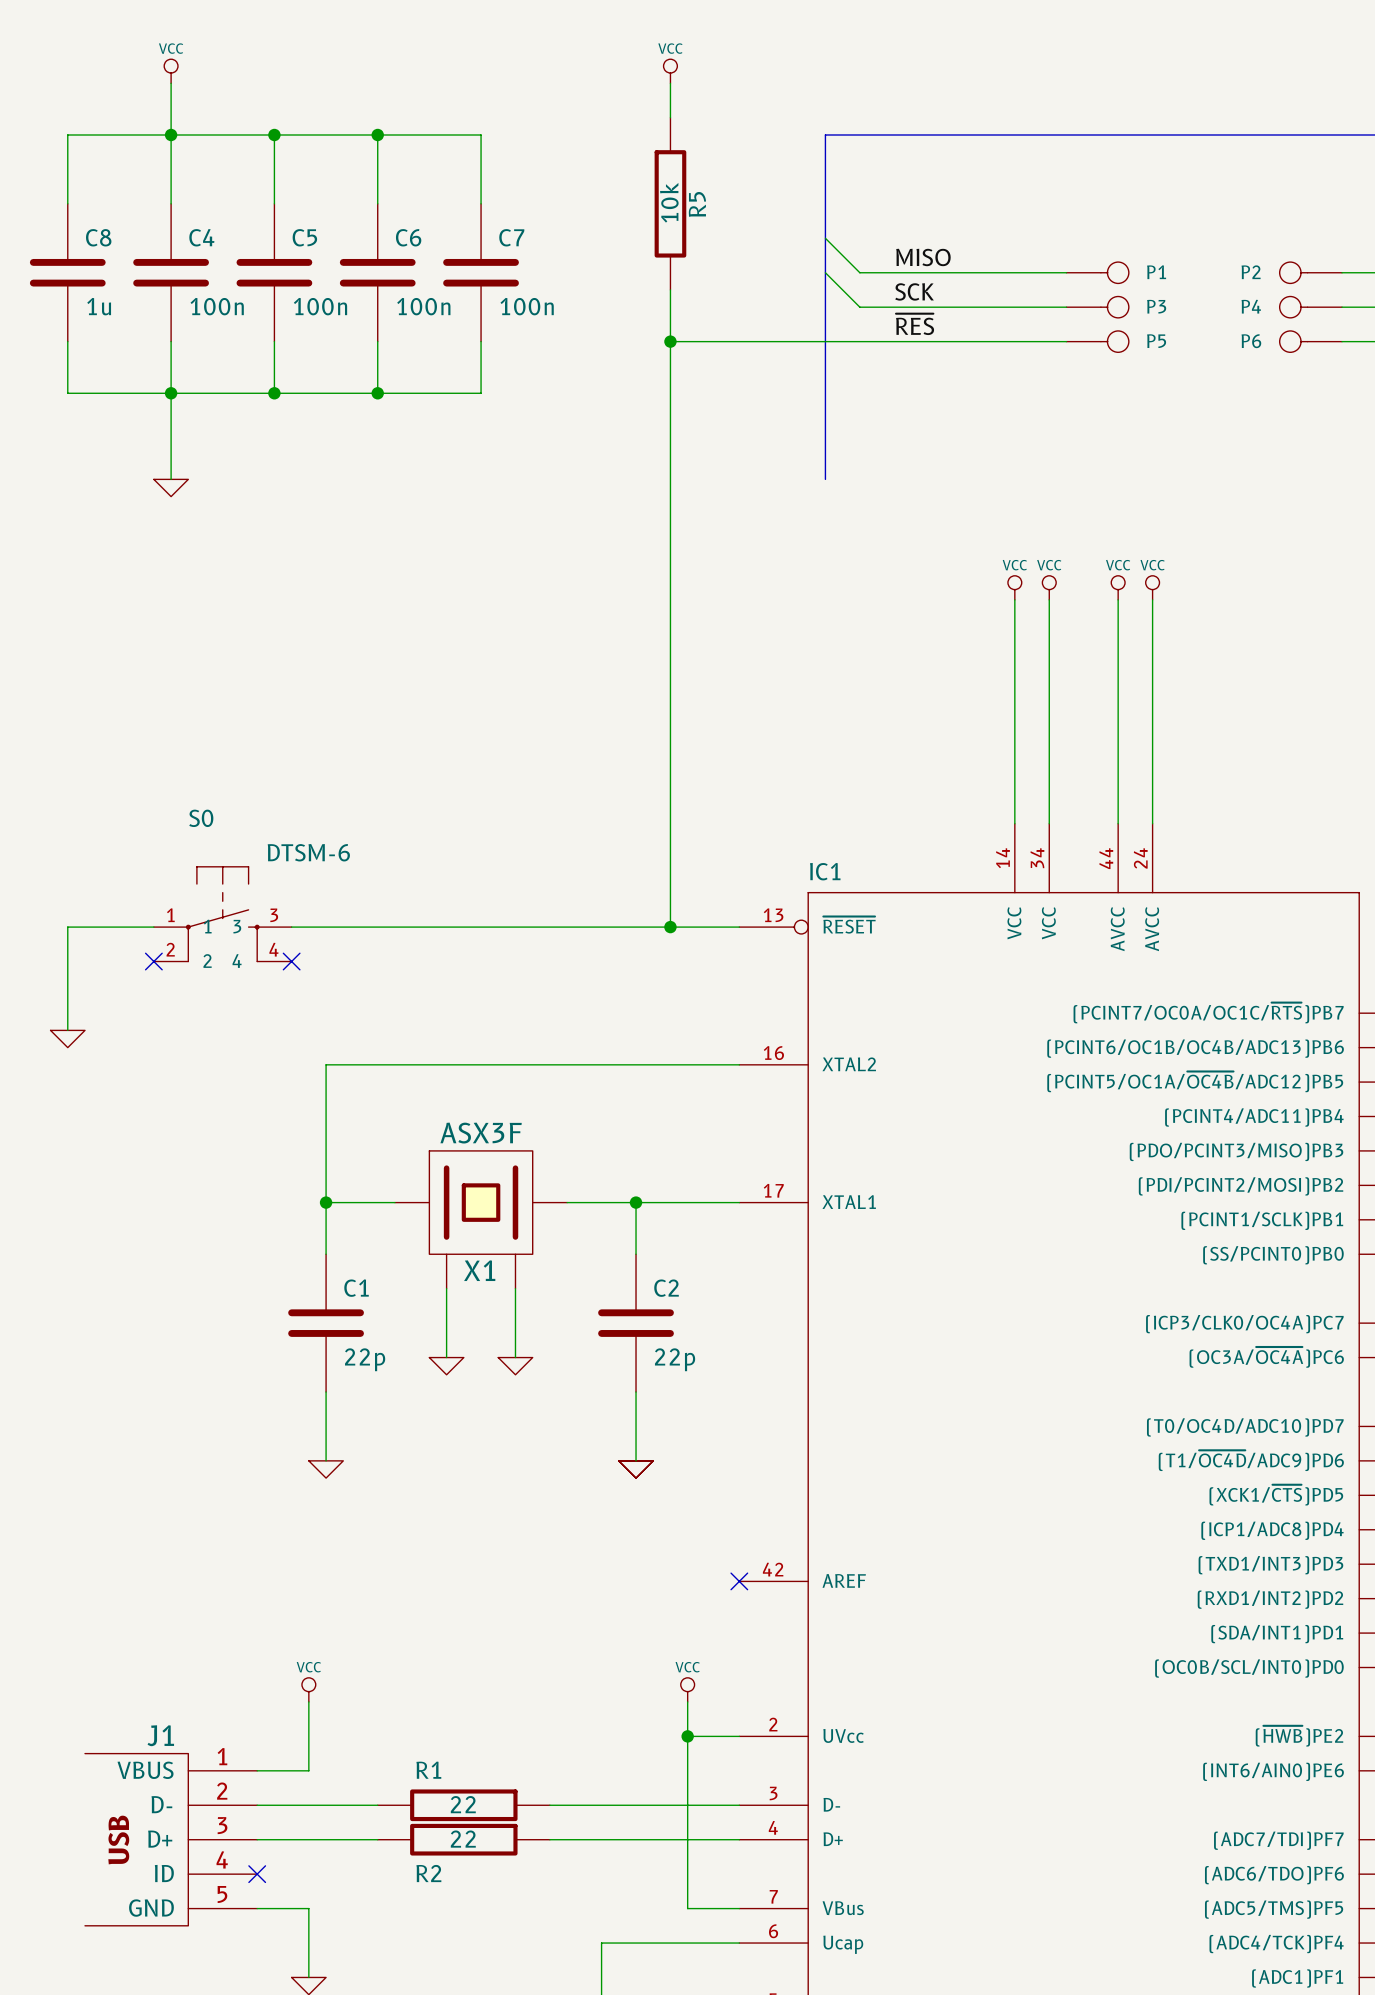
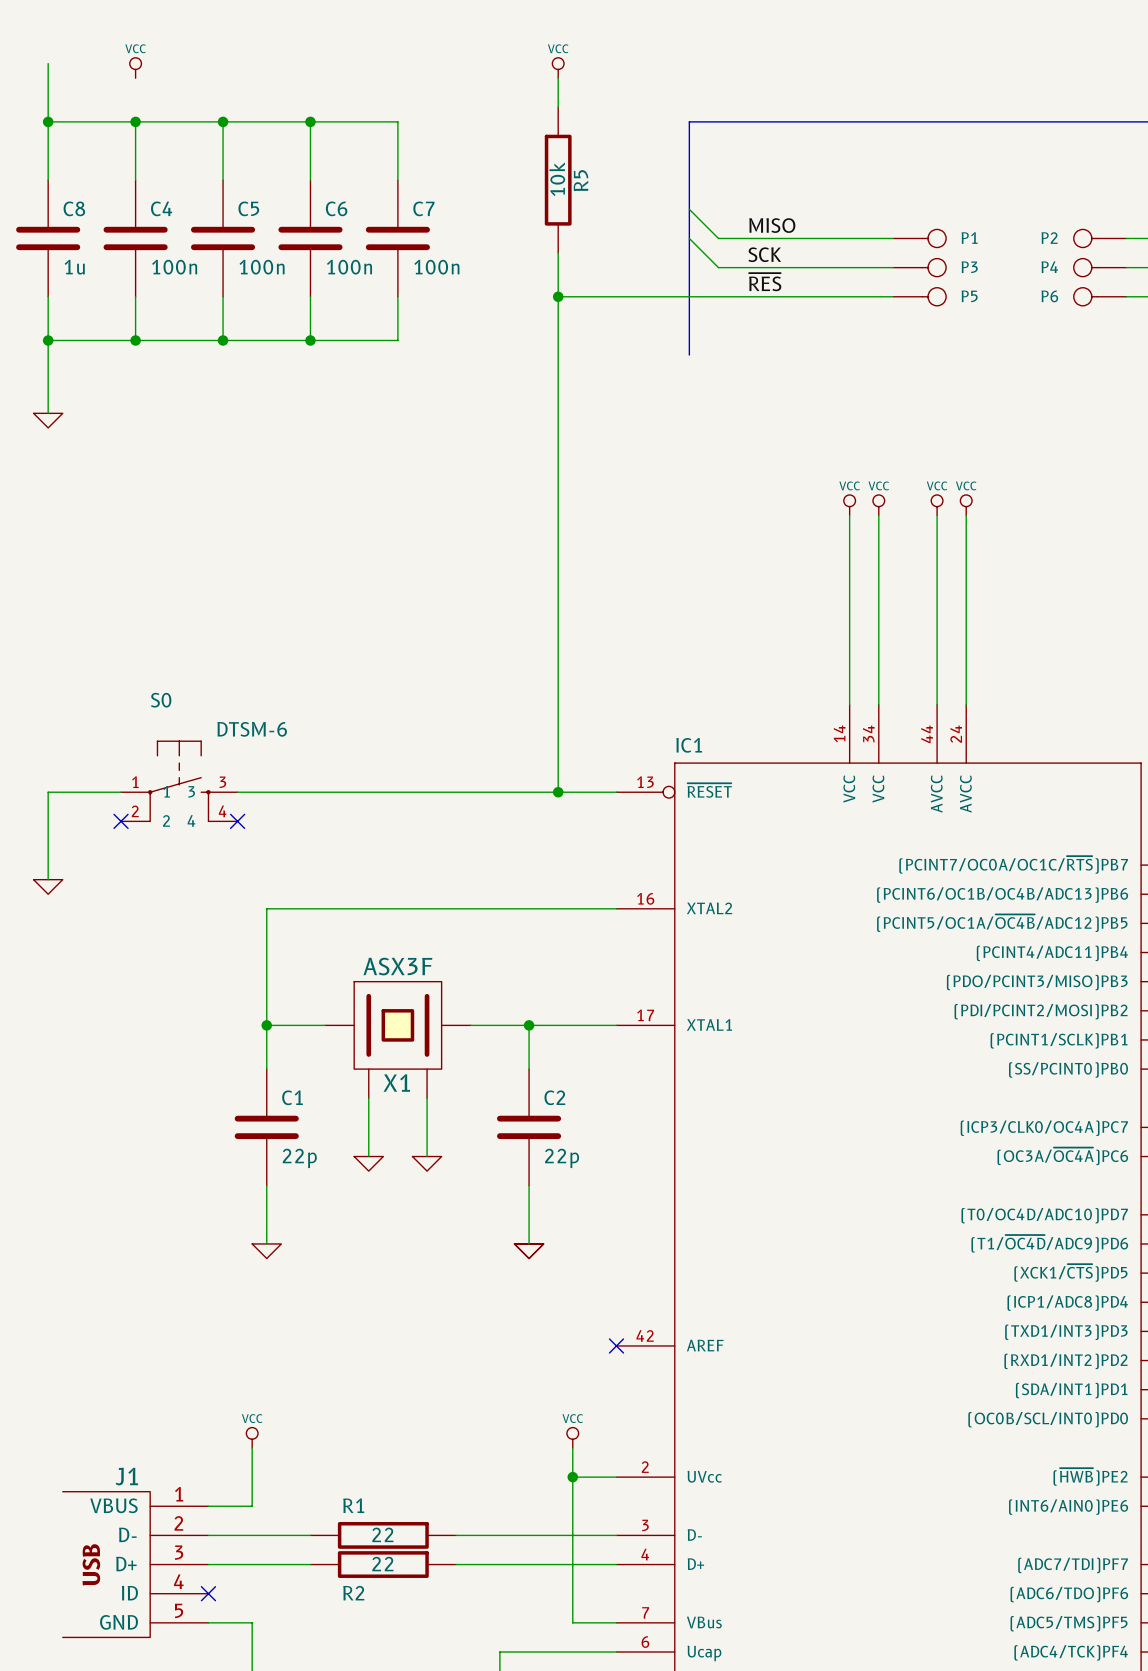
wire: none -> (48, 63) (48, 121)
wire: (171, 83) (171, 134) -> none
junction: none -> (48, 121)
junction: none -> (48, 340)
wire: (171, 393) (171, 479) -> (48, 340) (48, 413)
bus: (825, 410) (825, 479) -> none
power symbol position: (171, 487) -> (48, 420)

